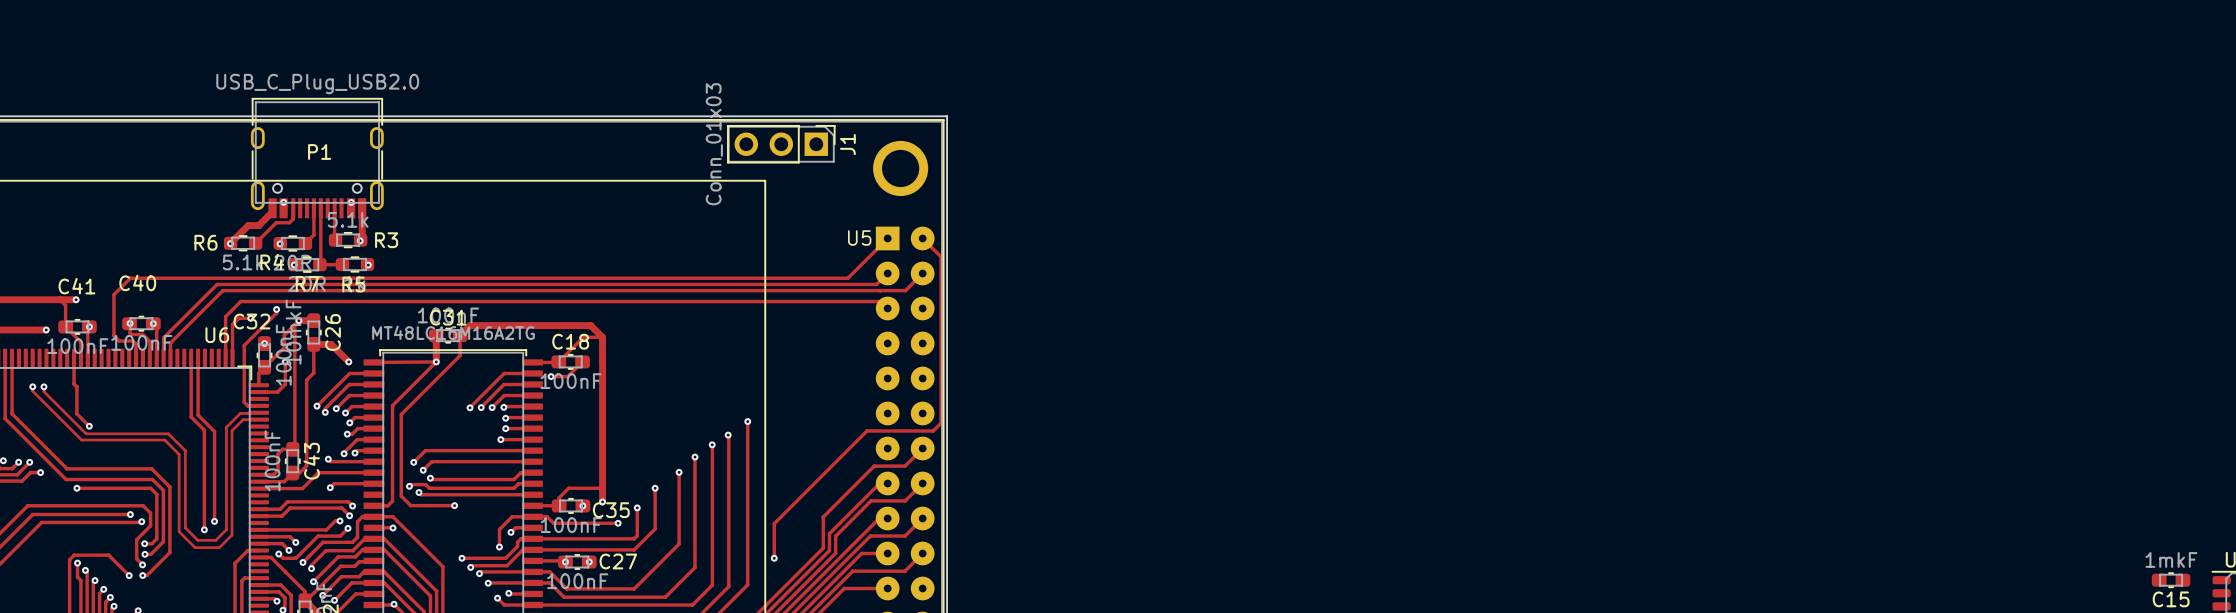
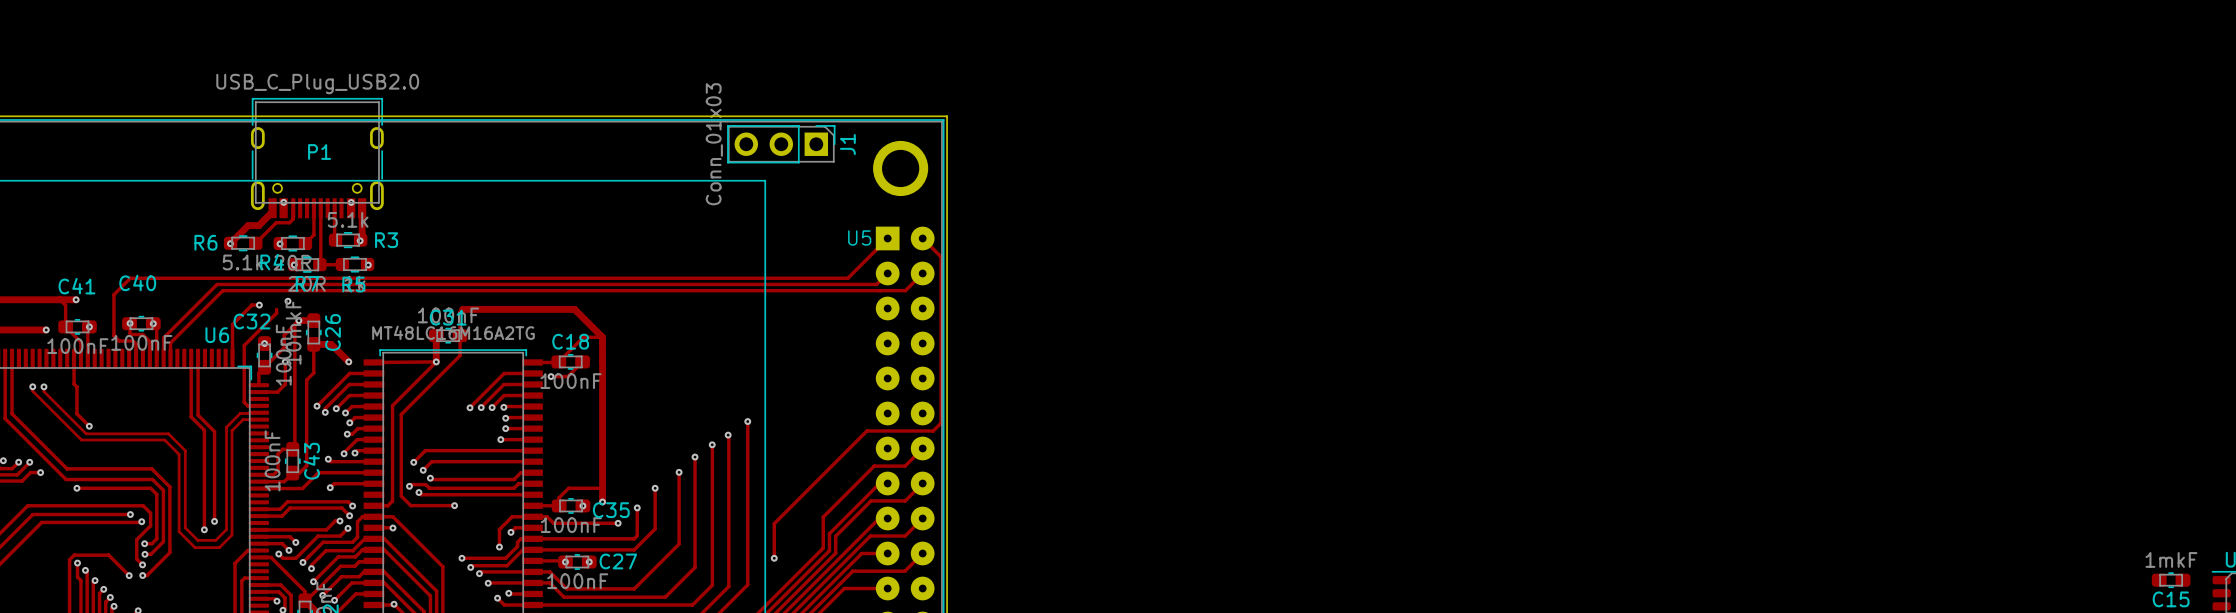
via: none -> (287, 301)
via: none -> (259, 305)
track: (887, 308) (880, 301) (240, 301) (225, 316) (225, 358) -> none
via: (276, 309) -> none
track: (238, 318) (250, 318) -> (238, 318) (252, 305) (259, 305)
via: (250, 318) -> none
track: (590, 325) (470, 325) (460, 335) -> (590, 325) (574, 309) (462, 309) (460, 311) (460, 335)

